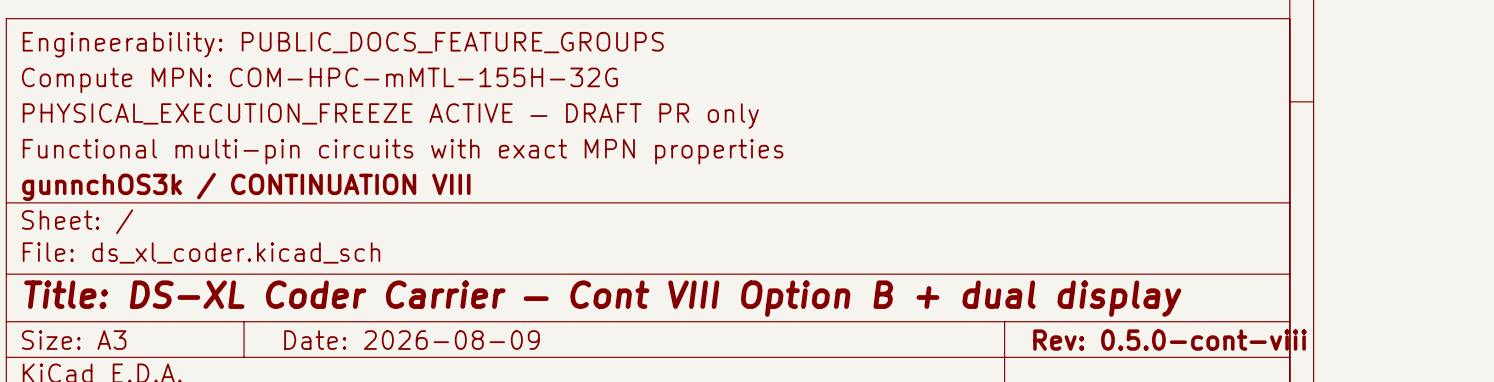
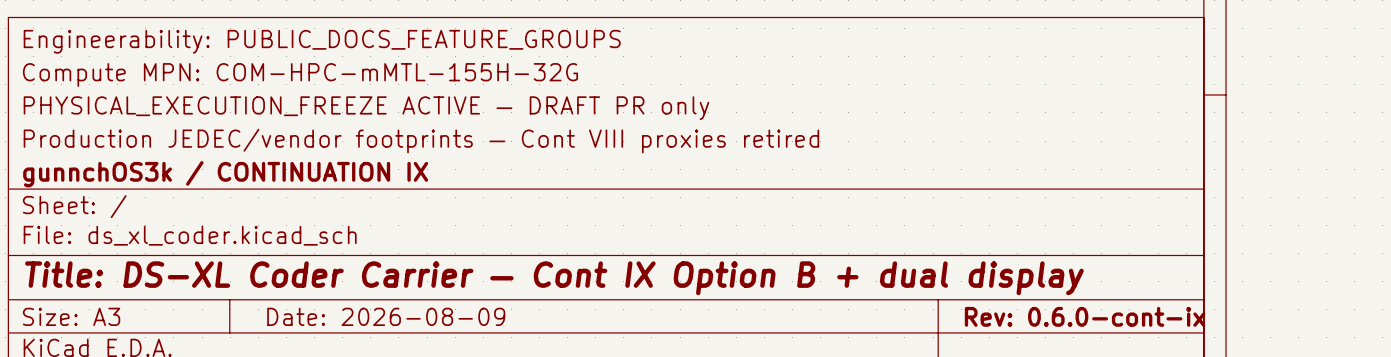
title block: Functional multi-pin circuits with exact MPN properties (403, 151) -> Production JEDEC/vendor footprints — Cont VIII proxies retired (421, 141)
title block: gunnchOS3k / CONTINUATION VIII (246, 186) -> gunnchOS3k / CONTINUATION IX (225, 174)
title block: Title: DS-XL Coder Carrier — Cont VIII Option B + dual display (602, 298) -> Title: DS-XL Coder Carrier — Cont IX Option B + dual display (554, 278)
title block: Rev: 0.5.0-cont-viii (1169, 340) -> Rev: 0.6.0-cont-ix (1085, 316)

